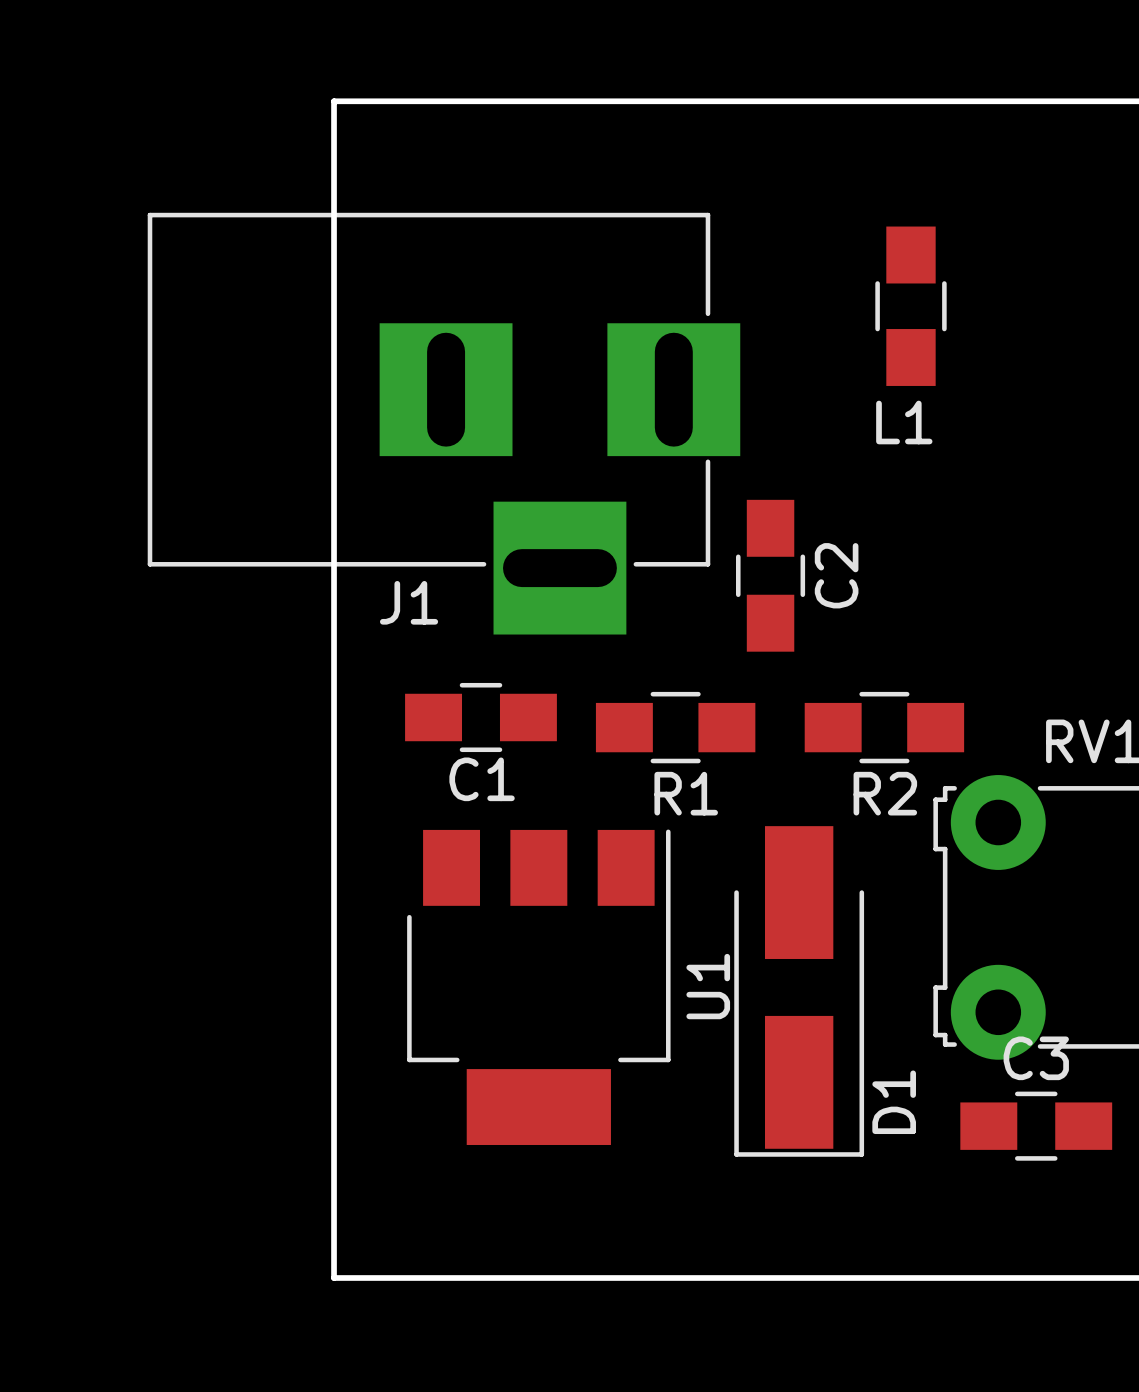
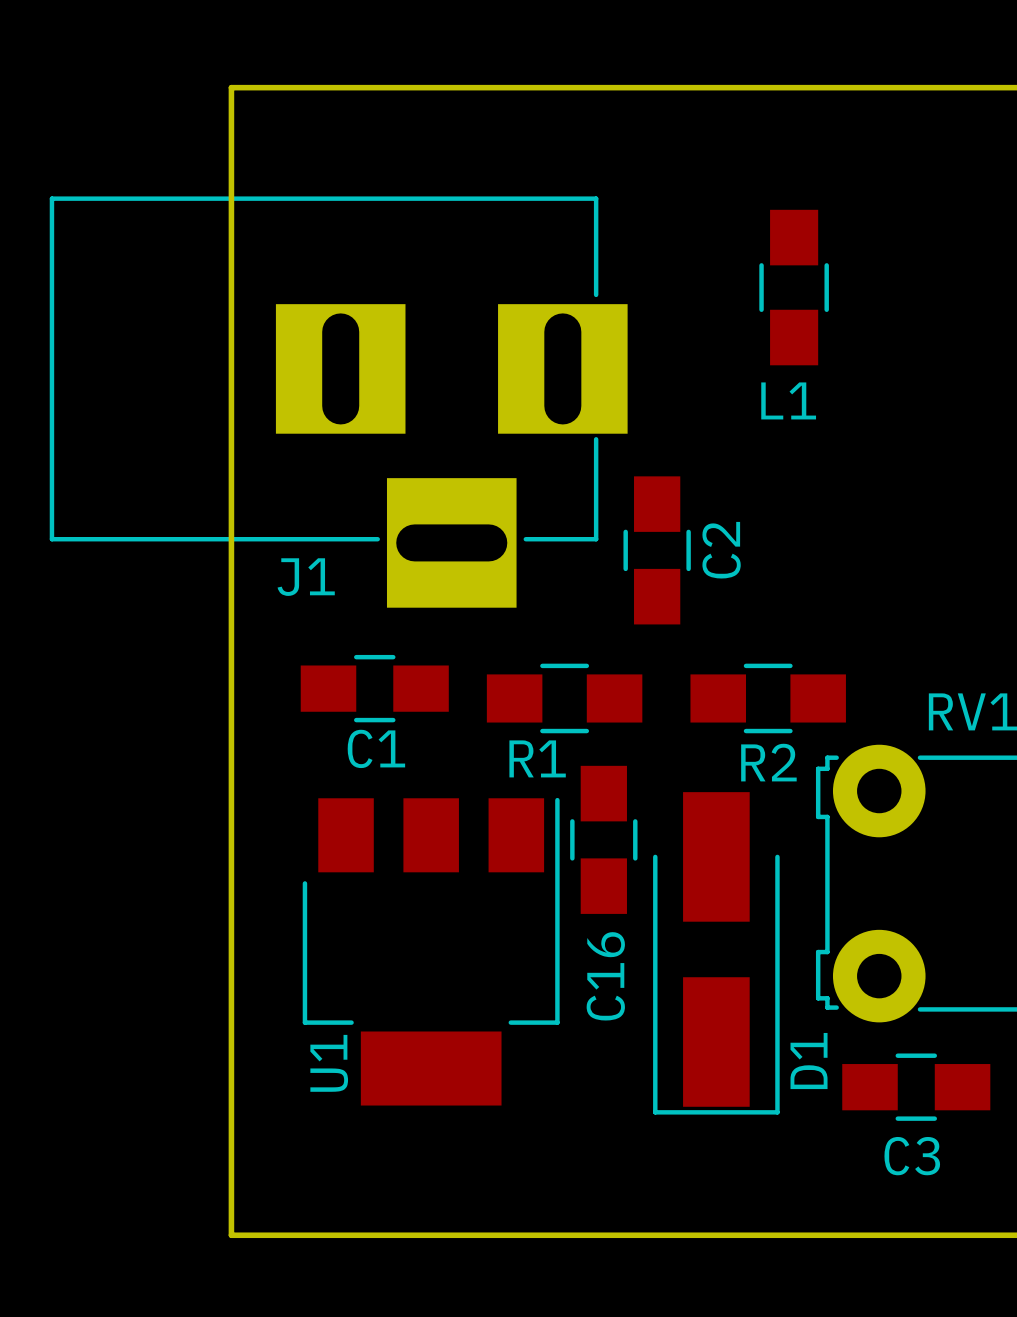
R1 name position: R1 (686, 793) -> R1 (537, 758)
C16: none -> (603, 839)
U1 name position: U1 (708, 986) -> U1 (329, 1063)
D1 position: (799, 991) -> (716, 953)
C3 name position: C3 (1036, 1058) -> C3 (912, 1156)

